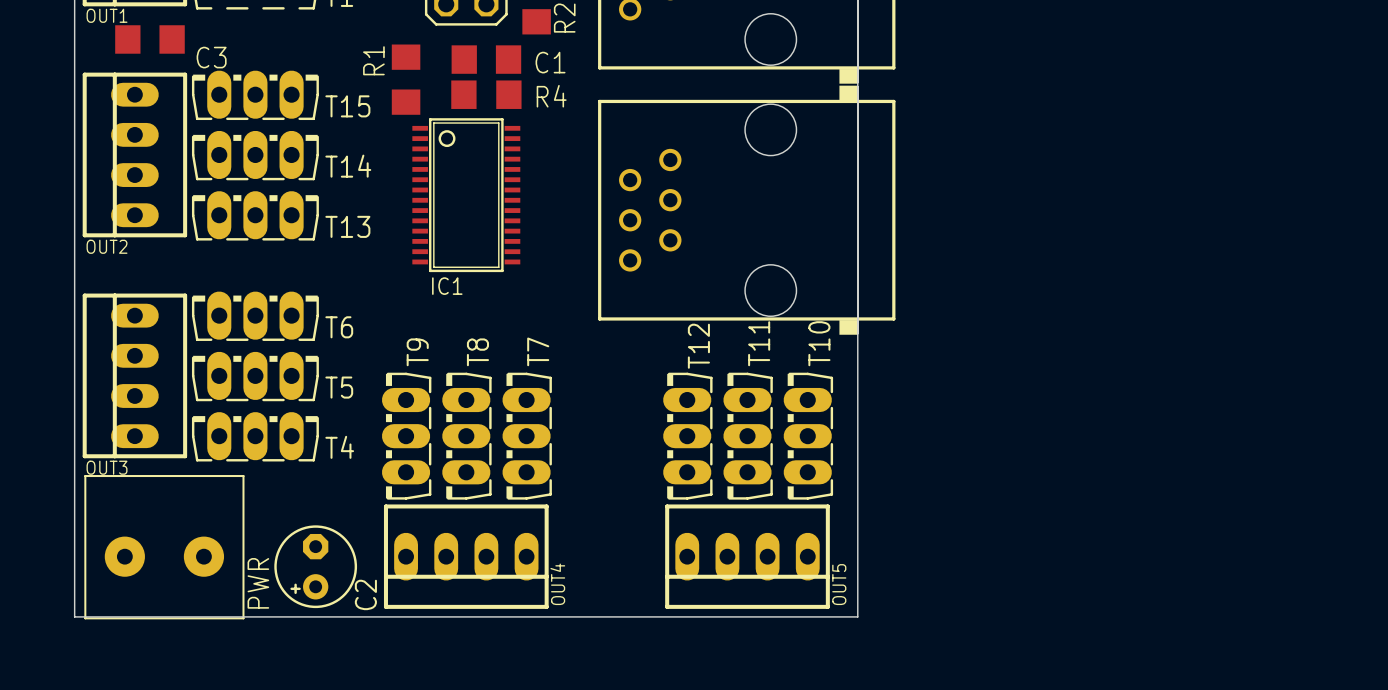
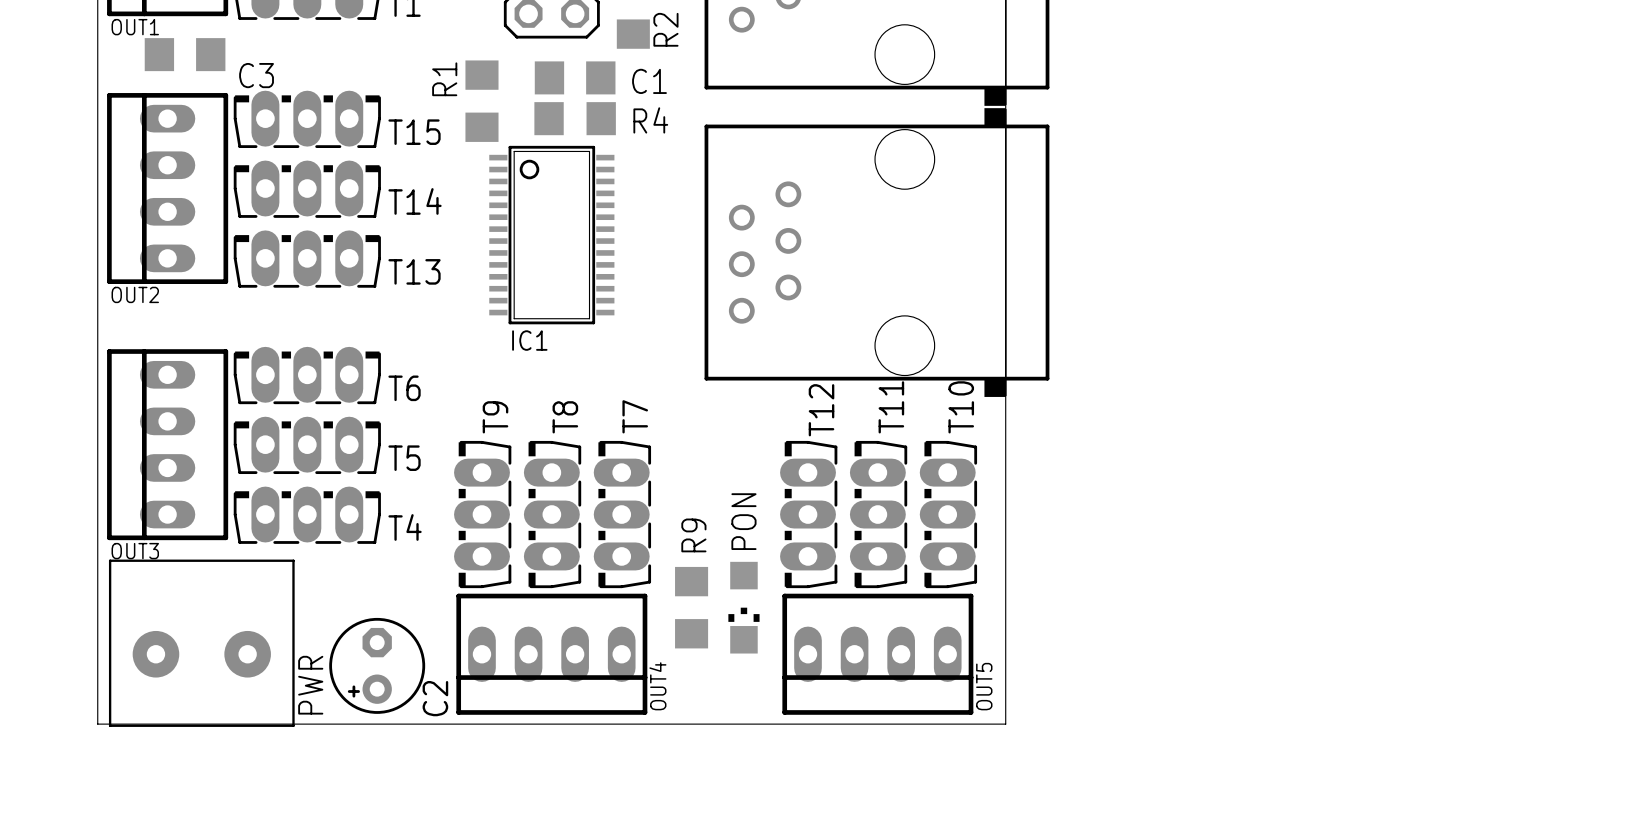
R9: none -> (691, 607)
PON: none -> (743, 607)

